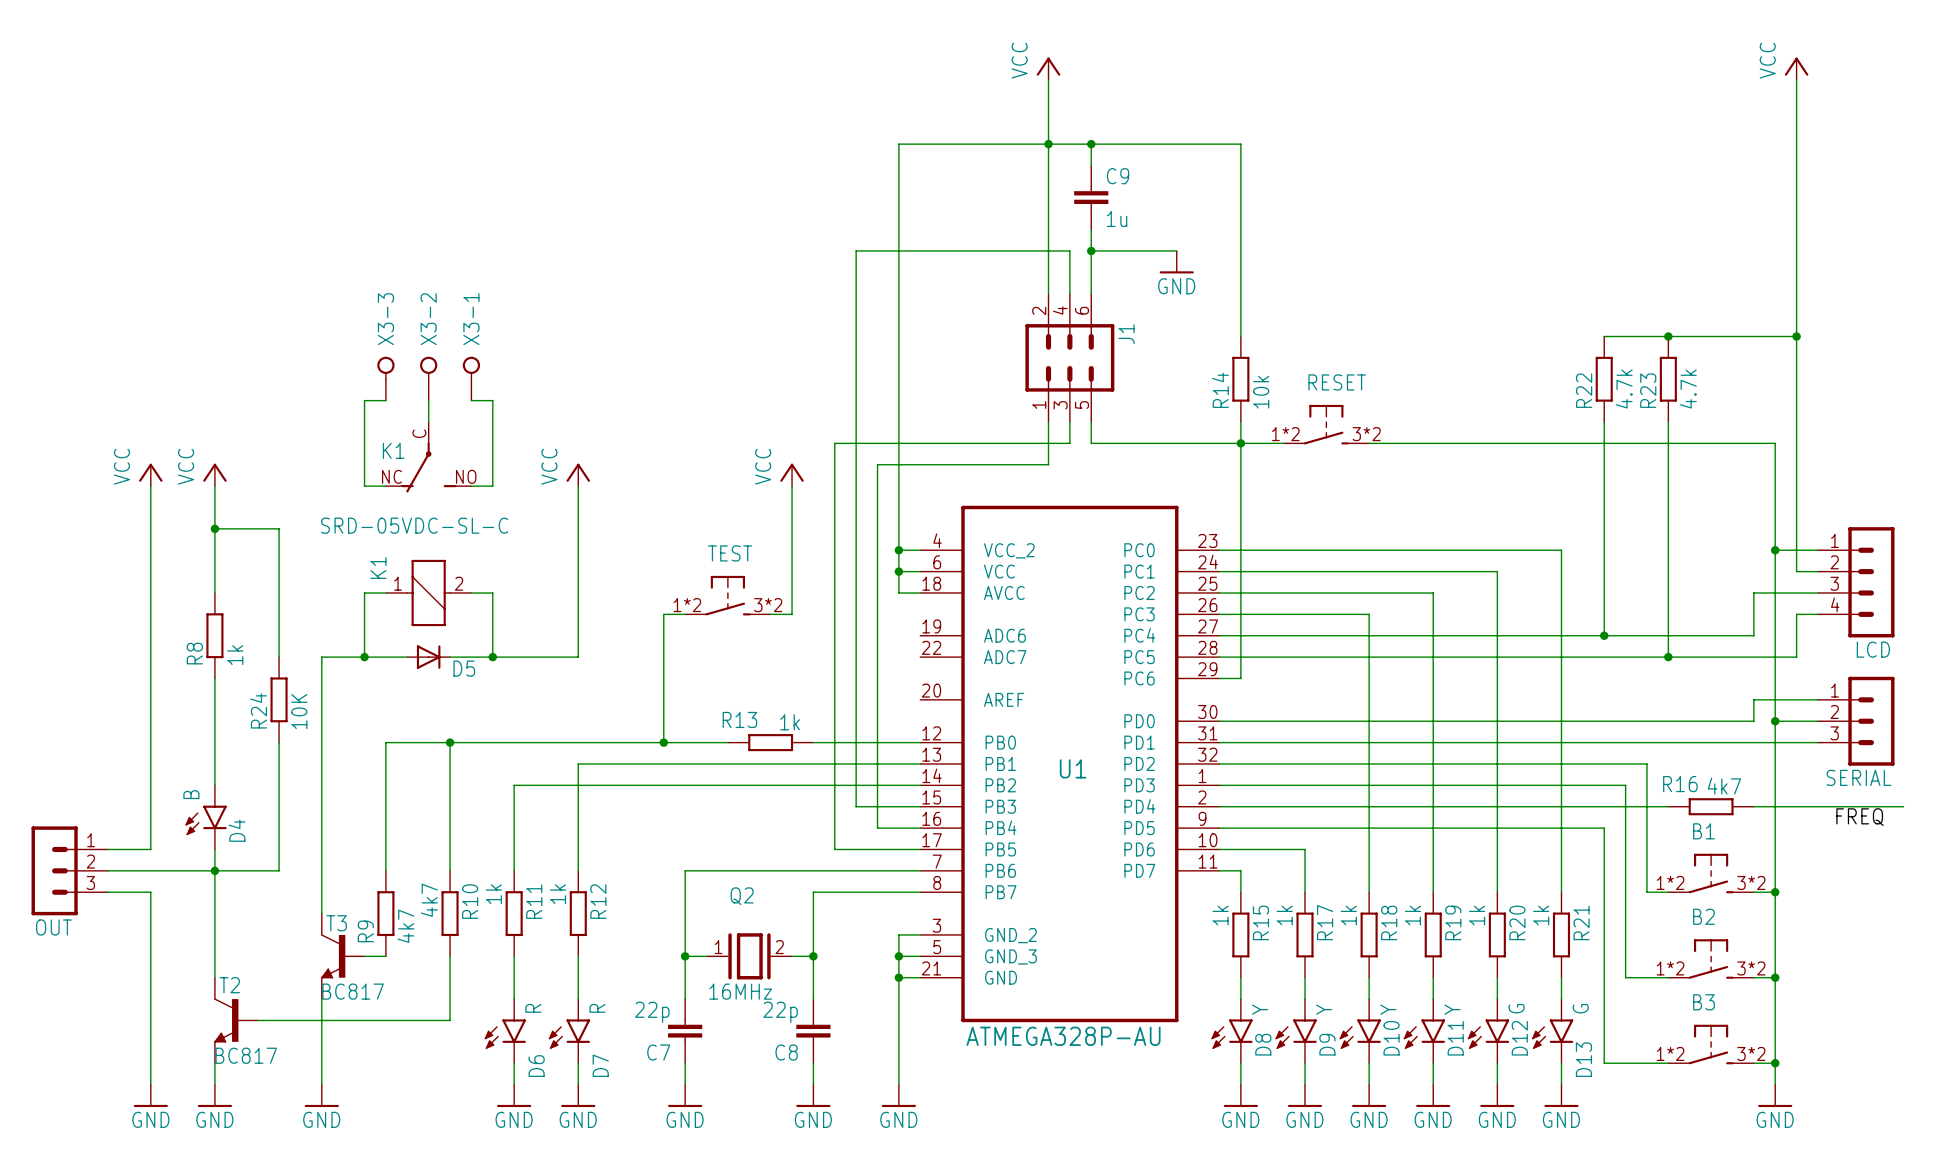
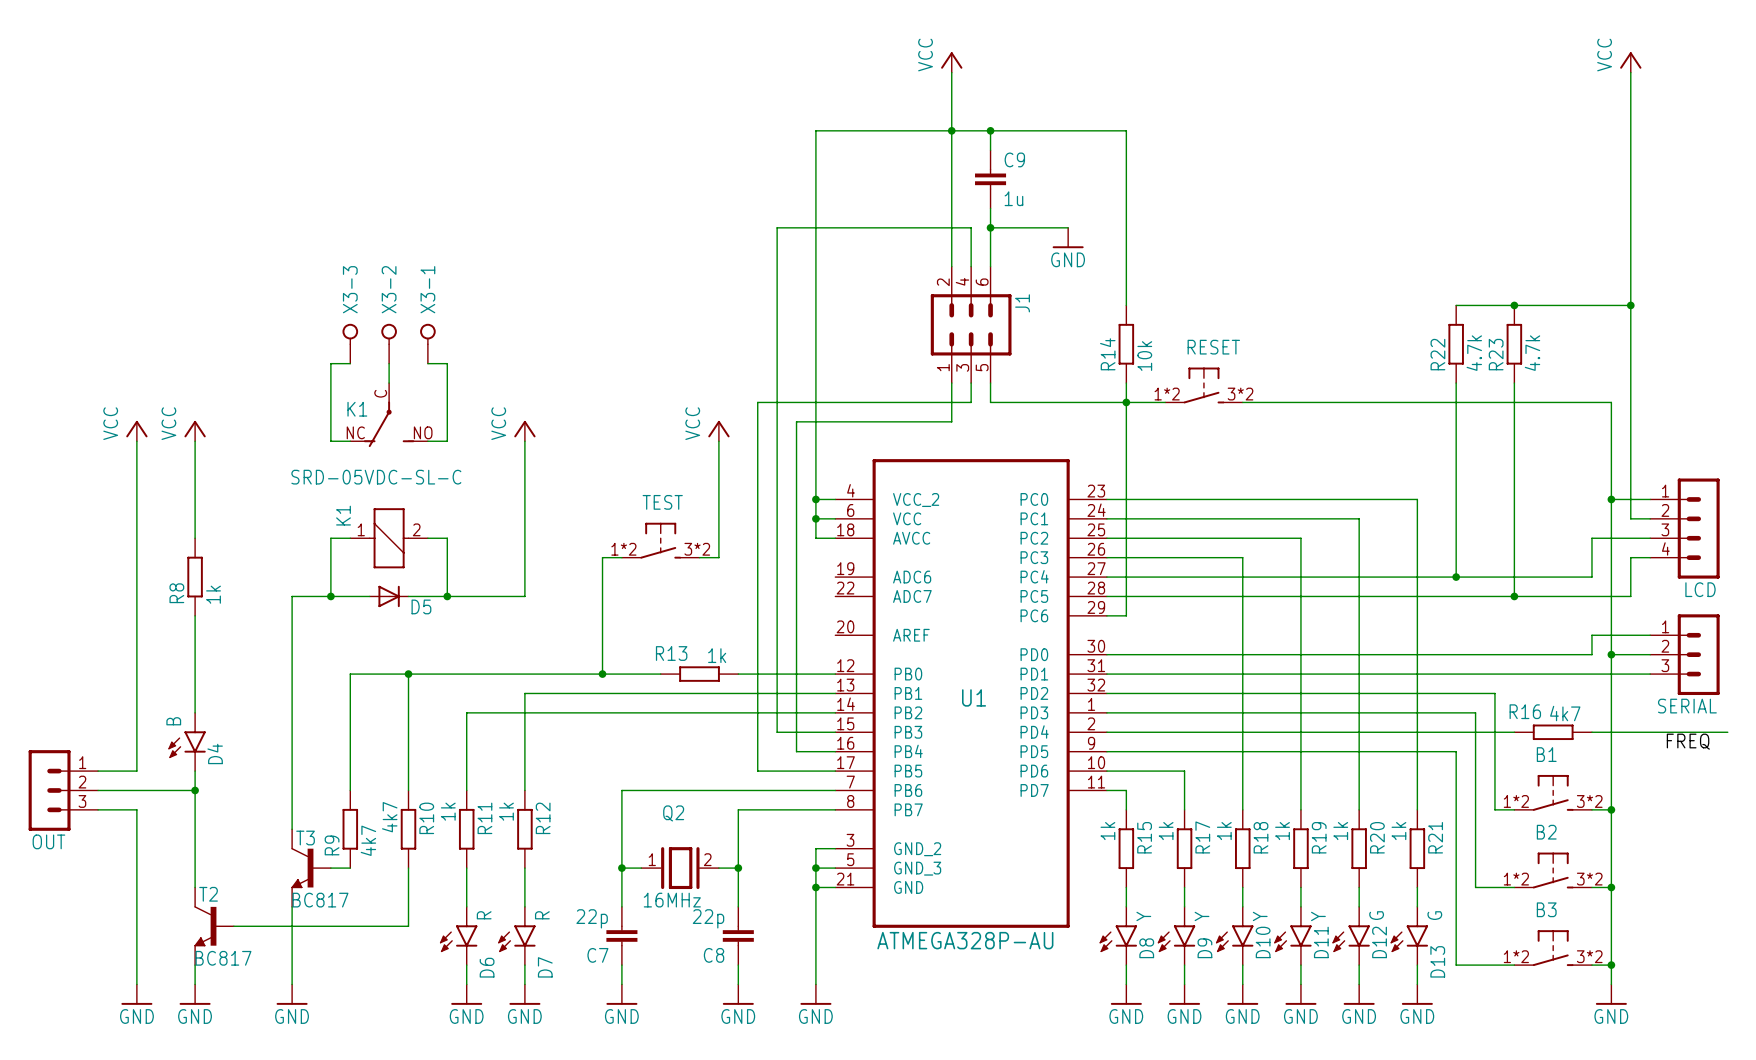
wire: (214, 528) (279, 528) (279, 657) -> none
junction: (214, 528) -> none
R24: 10K (279, 699) -> none
wire: (279, 742) (279, 870) (214, 870) -> none

